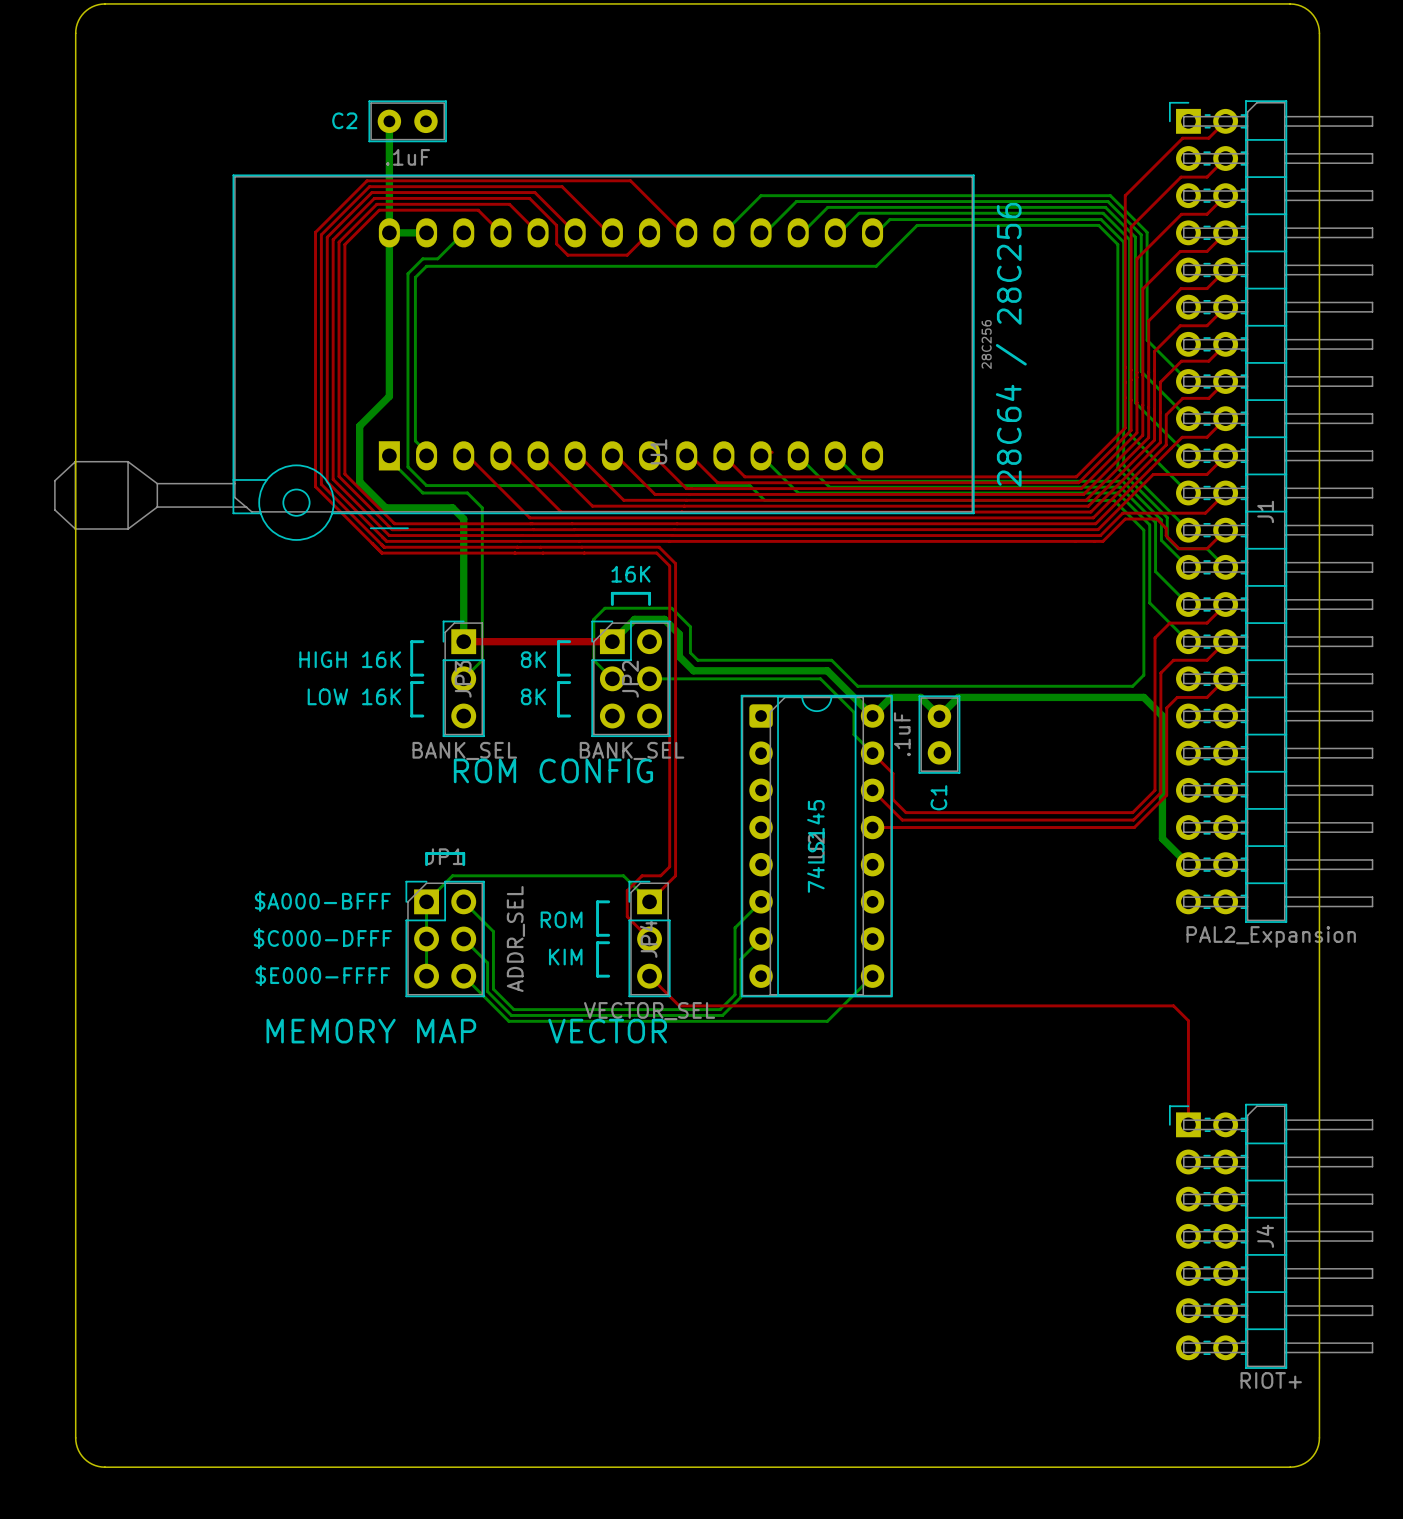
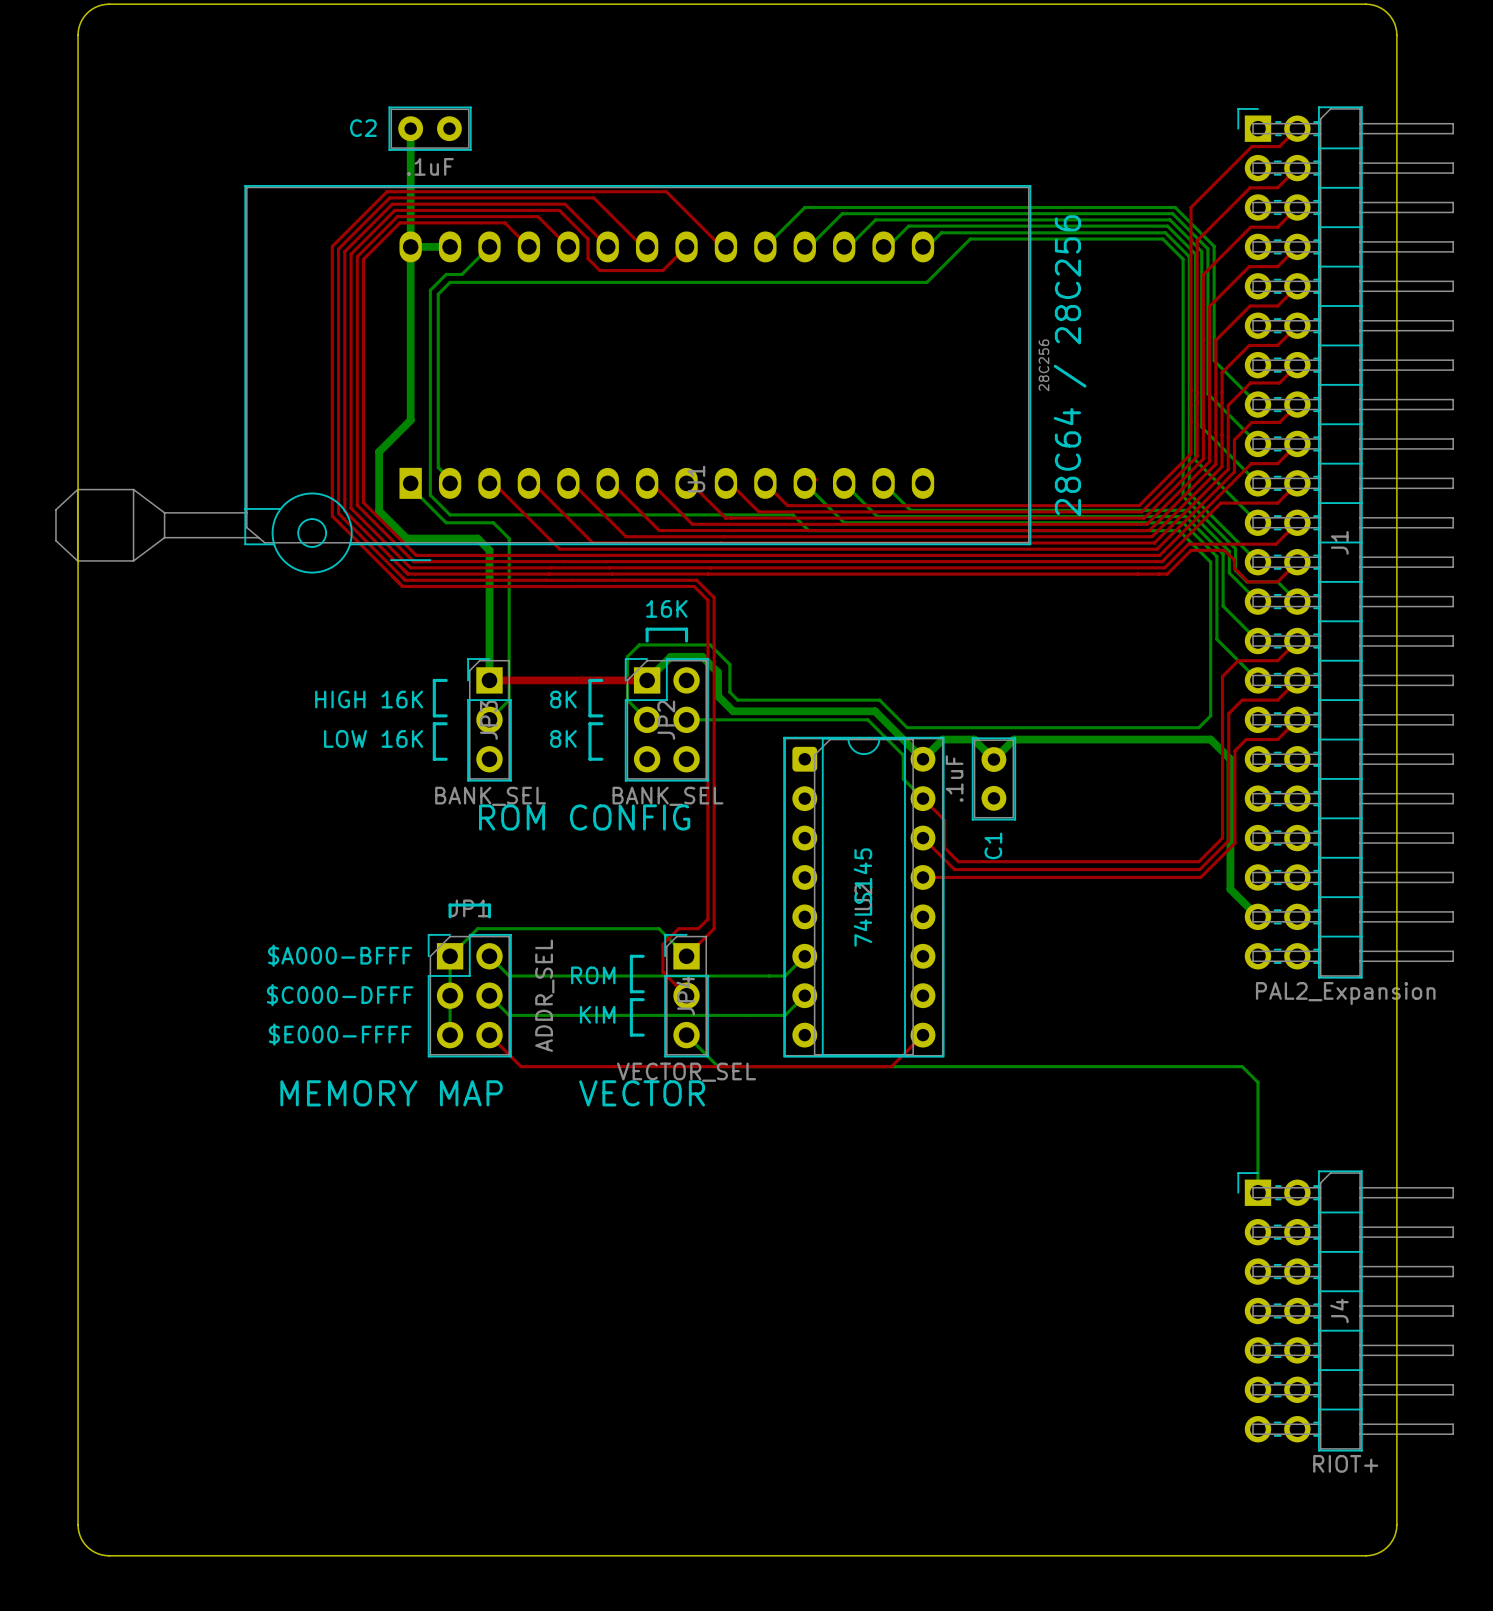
bottom track: (482, 920) (493, 931) (493, 989) (513, 1009) (720, 1009) (735, 994) (735, 927) (742, 920) -> (509, 975) (785, 975)
bottom track: (482, 957) (487, 962) (487, 991) (511, 1015) (722, 1015) (740, 997) (740, 959) (742, 957) -> (509, 1015) (785, 1015)
bottom track: (463, 976) (508, 1021) (827, 1021) (872, 976) -> none
top track: (649, 976) (679, 1005) -> (489, 1035) (521, 1066) (718, 1066)
bottom track: none -> (686, 1035) (718, 1066) (1242, 1066) (1257, 1082) (1257, 1192)
top track: (842, 1005) (1173, 1005) (1188, 1020) (1188, 1124) -> (891, 1066) (923, 1035)

